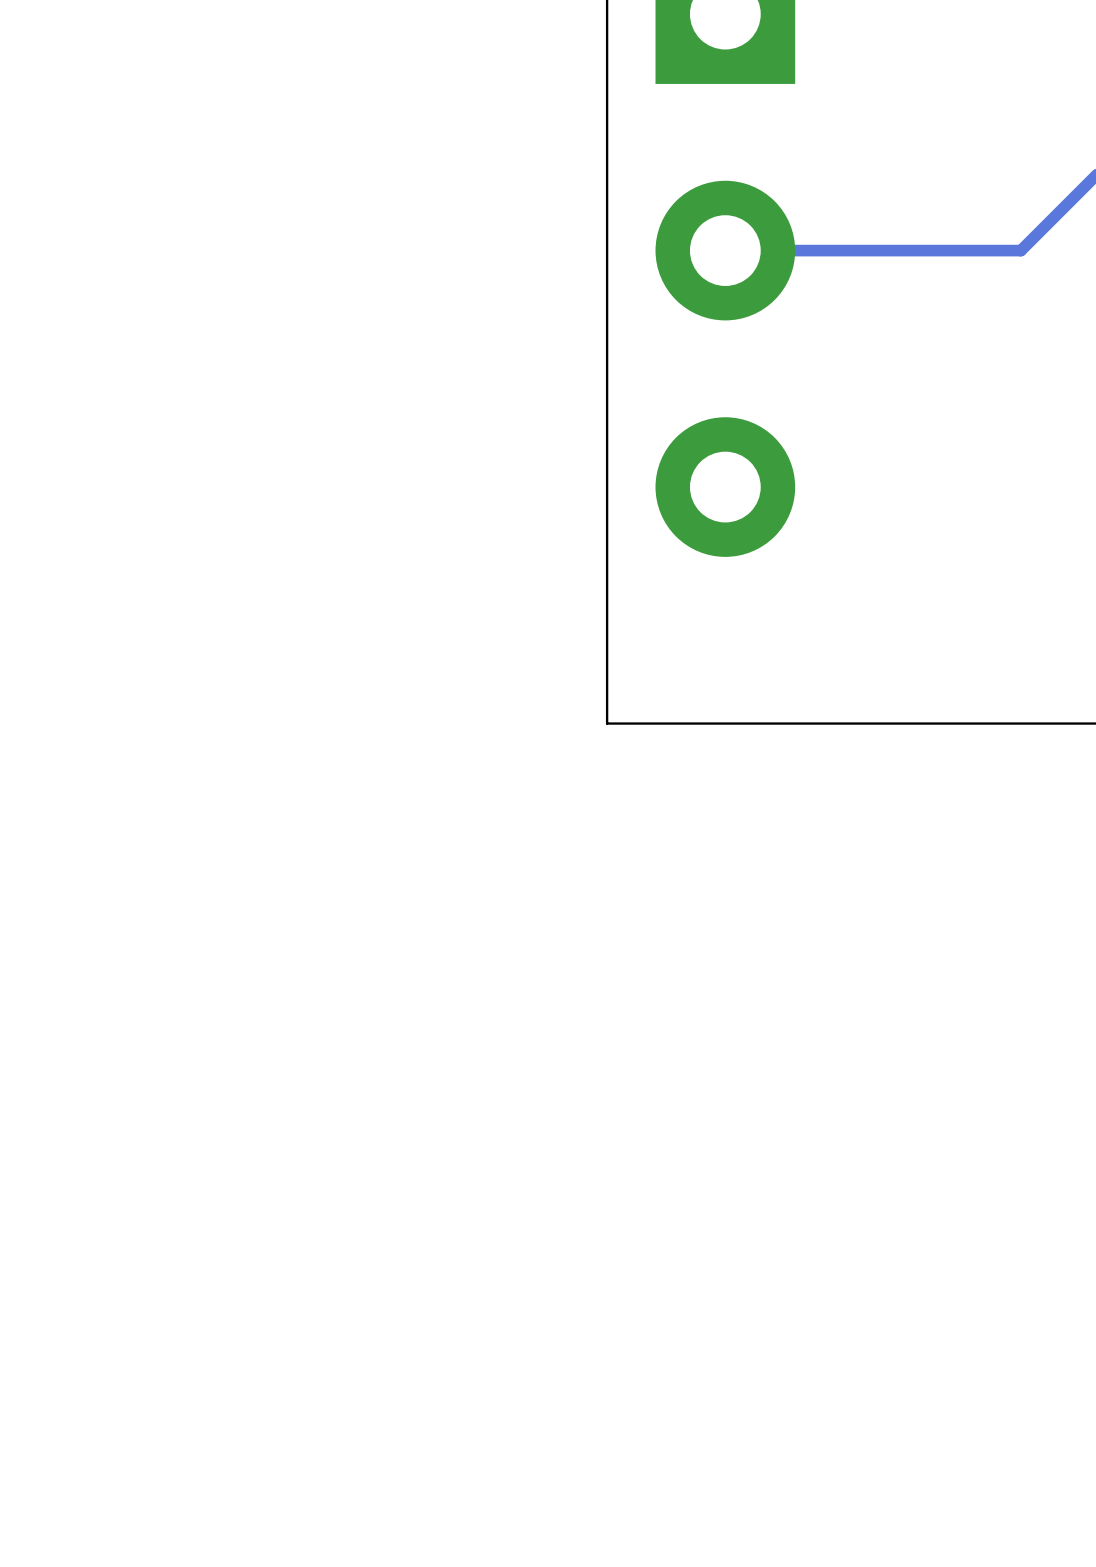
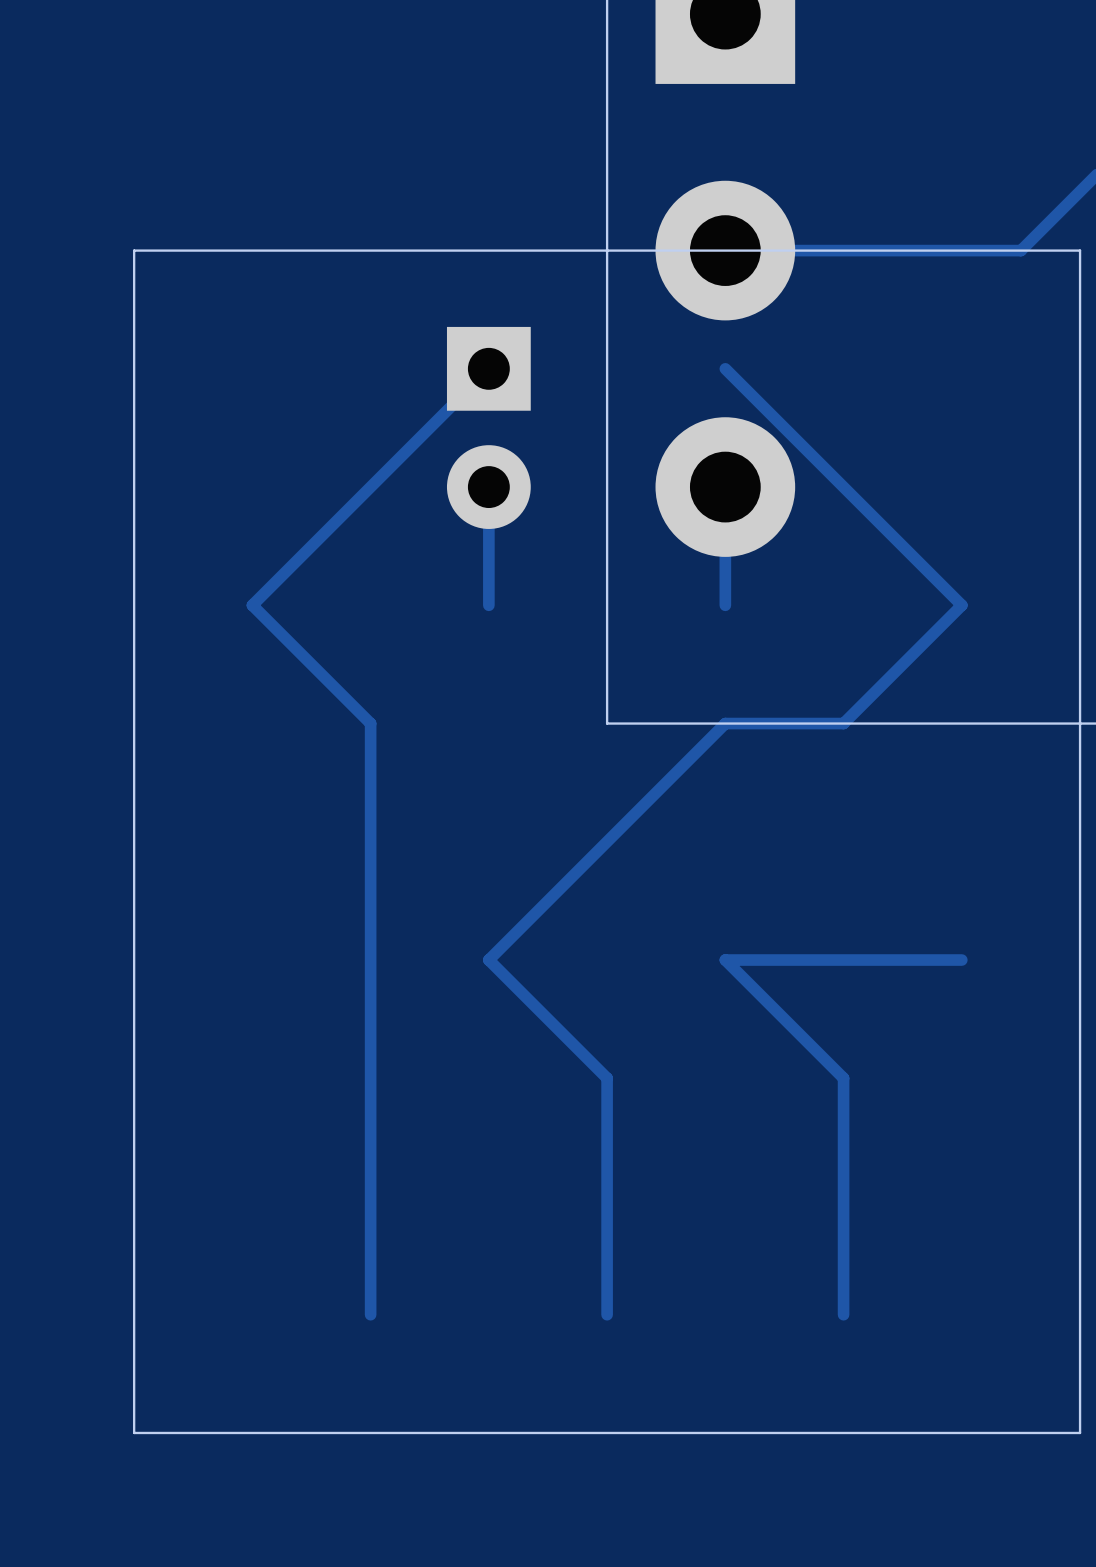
board edge: none -> (1080, 250) (134, 250) (134, 1432) (1080, 1432) (1080, 250)
track: none -> (488, 368) (252, 605) (370, 723) (370, 1314)
track: none -> (725, 368) (961, 605) (843, 723) (725, 723) (488, 960) (607, 1078) (607, 1314)
part: none -> (488, 427)
track: none -> (488, 487) (488, 605)
track: none -> (725, 487) (725, 605)
track: none -> (961, 960) (725, 960) (843, 1078) (843, 1314)

